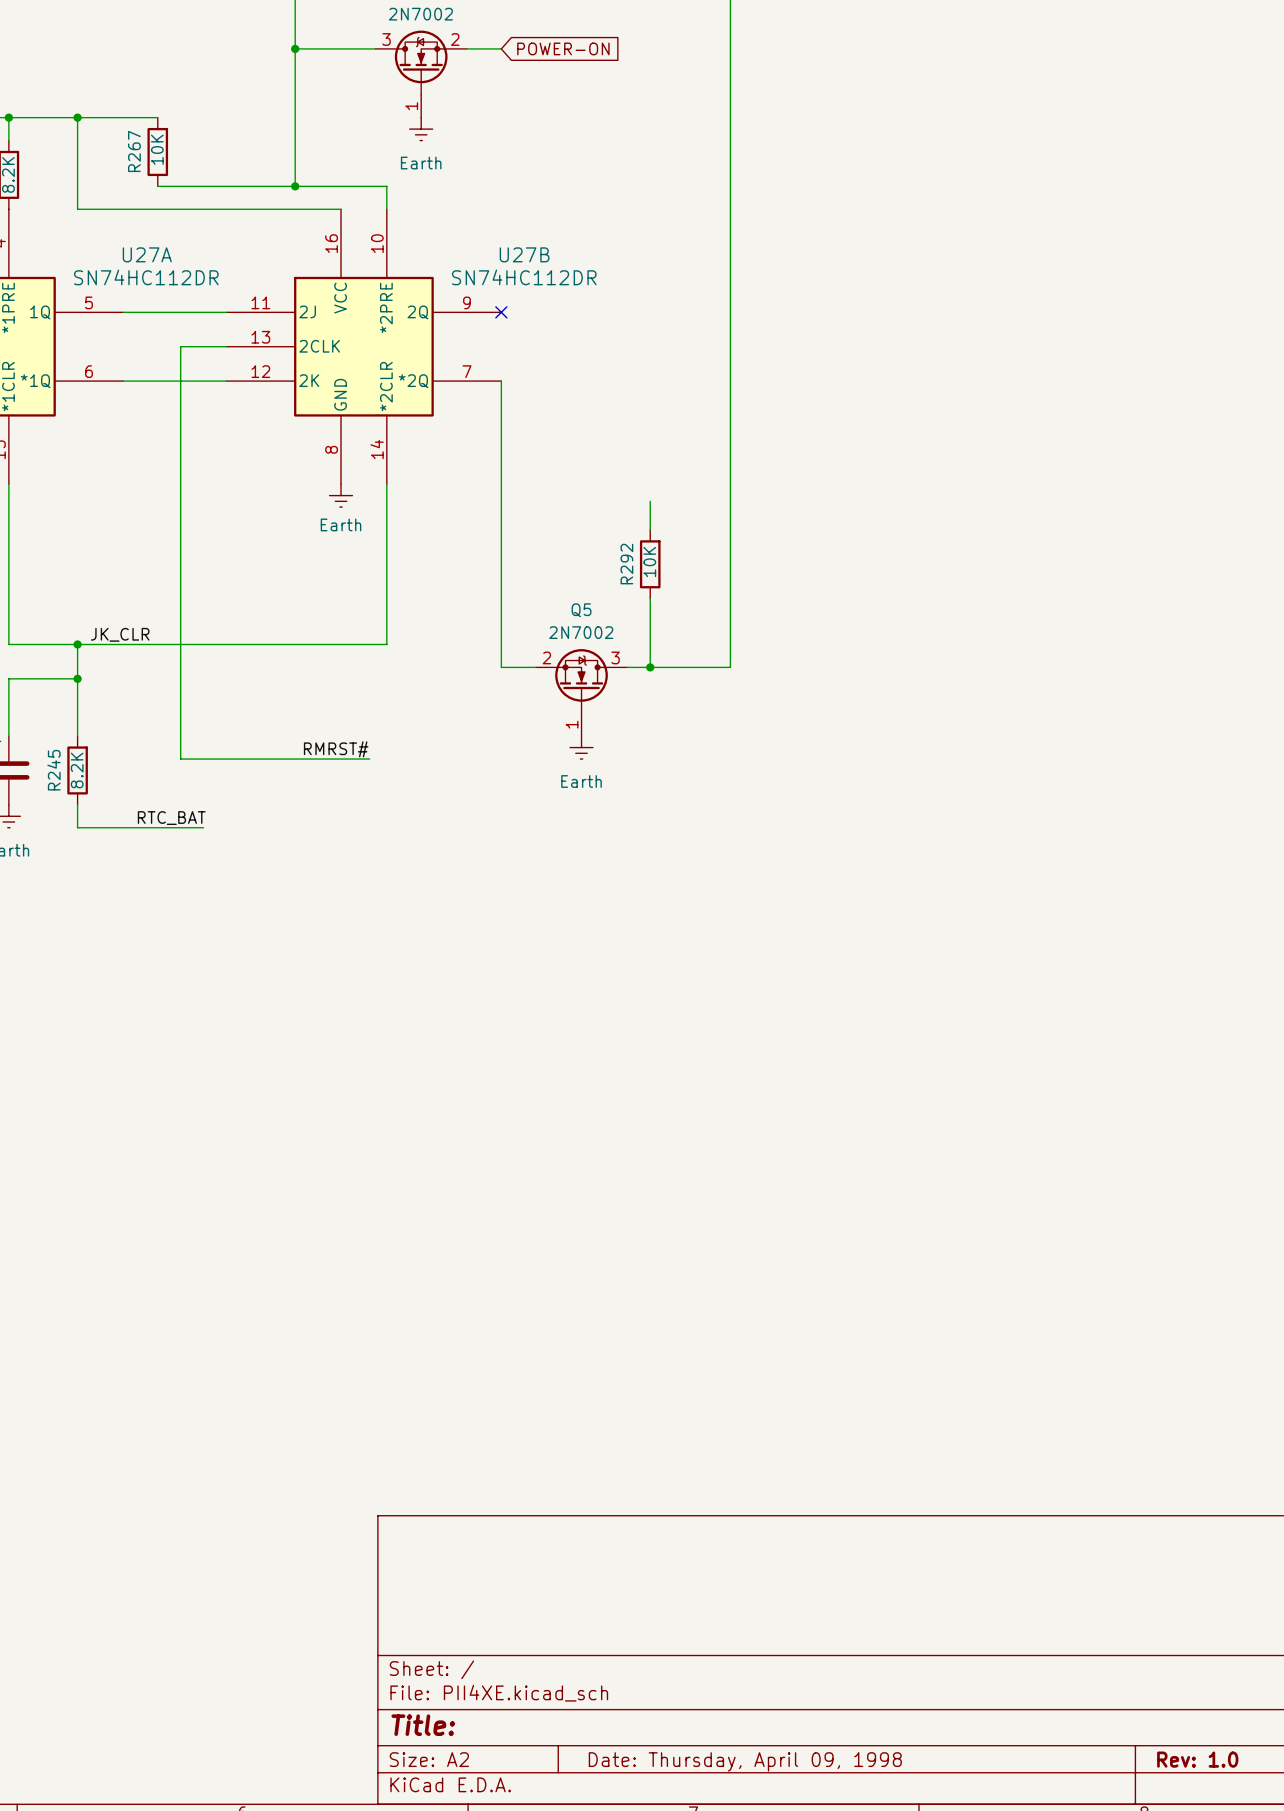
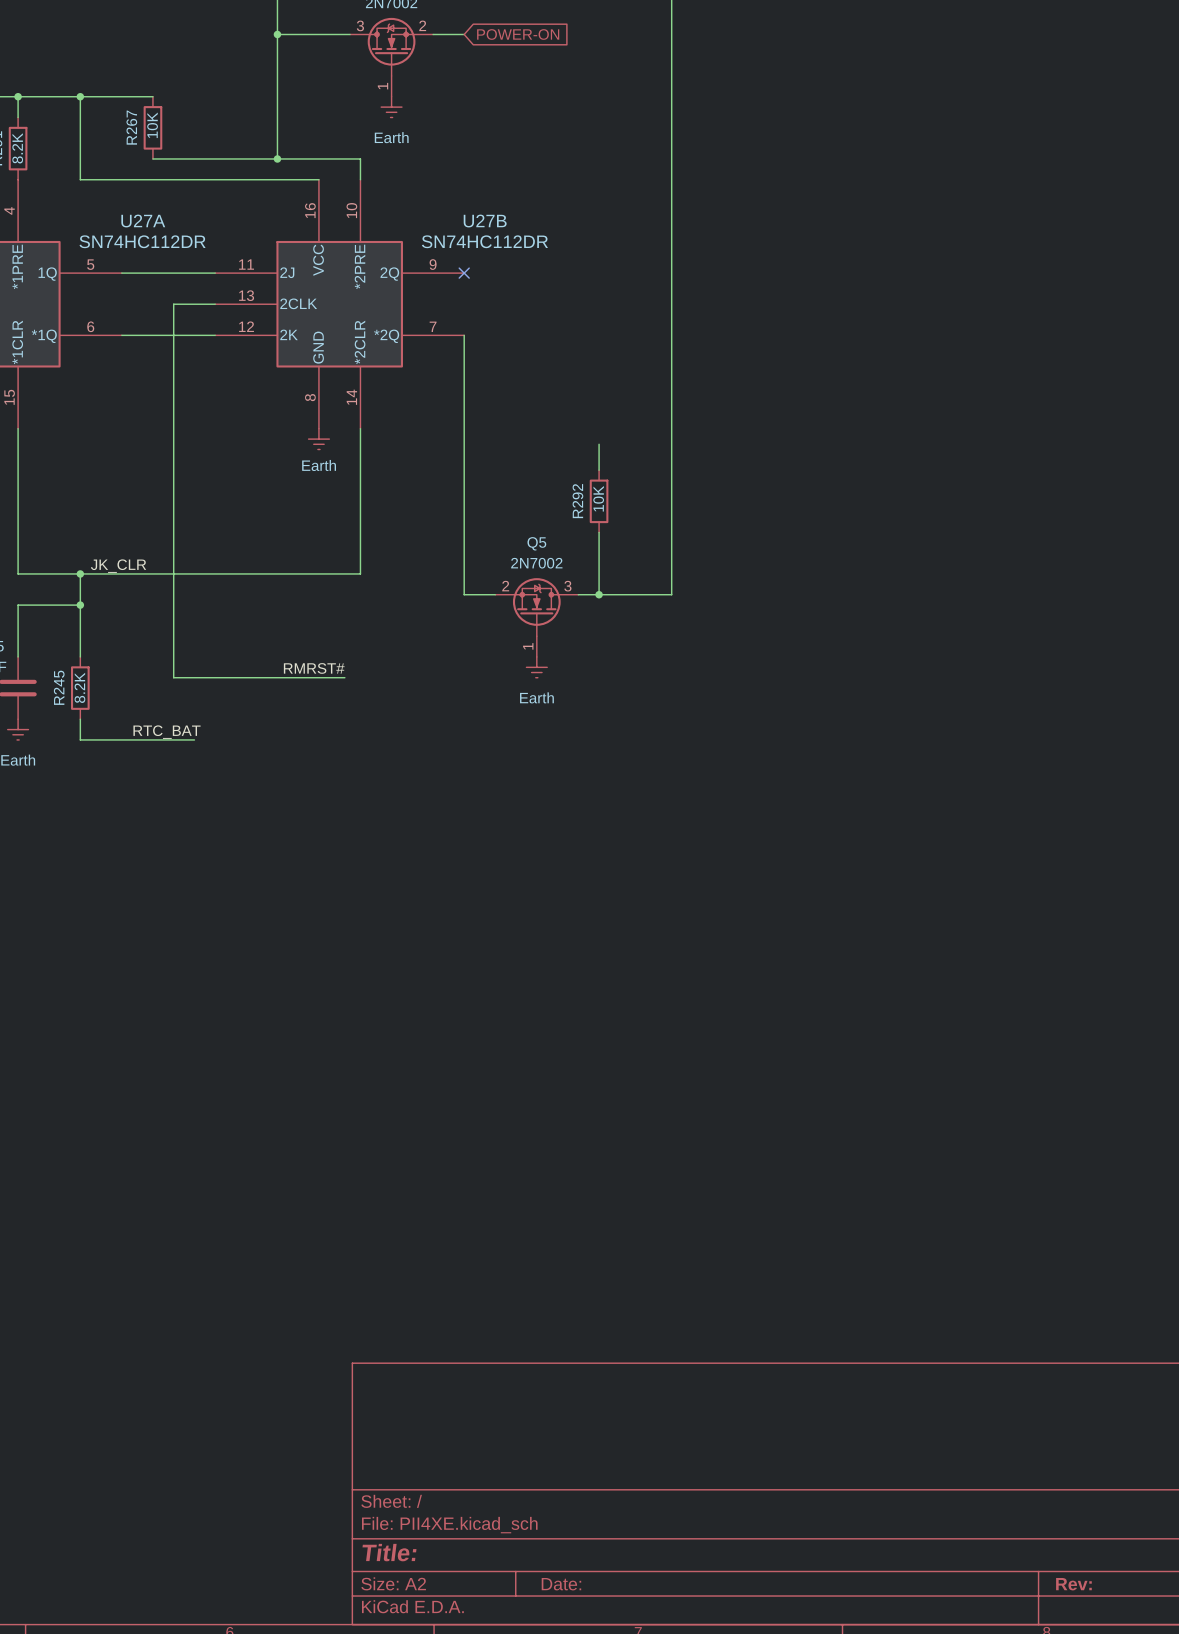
title block: Rev: 1.0 (1197, 1759) -> Rev: (1073, 1584)
title block: Date: Thursday, April 09, 1998 (745, 1761) -> Date: (561, 1584)

